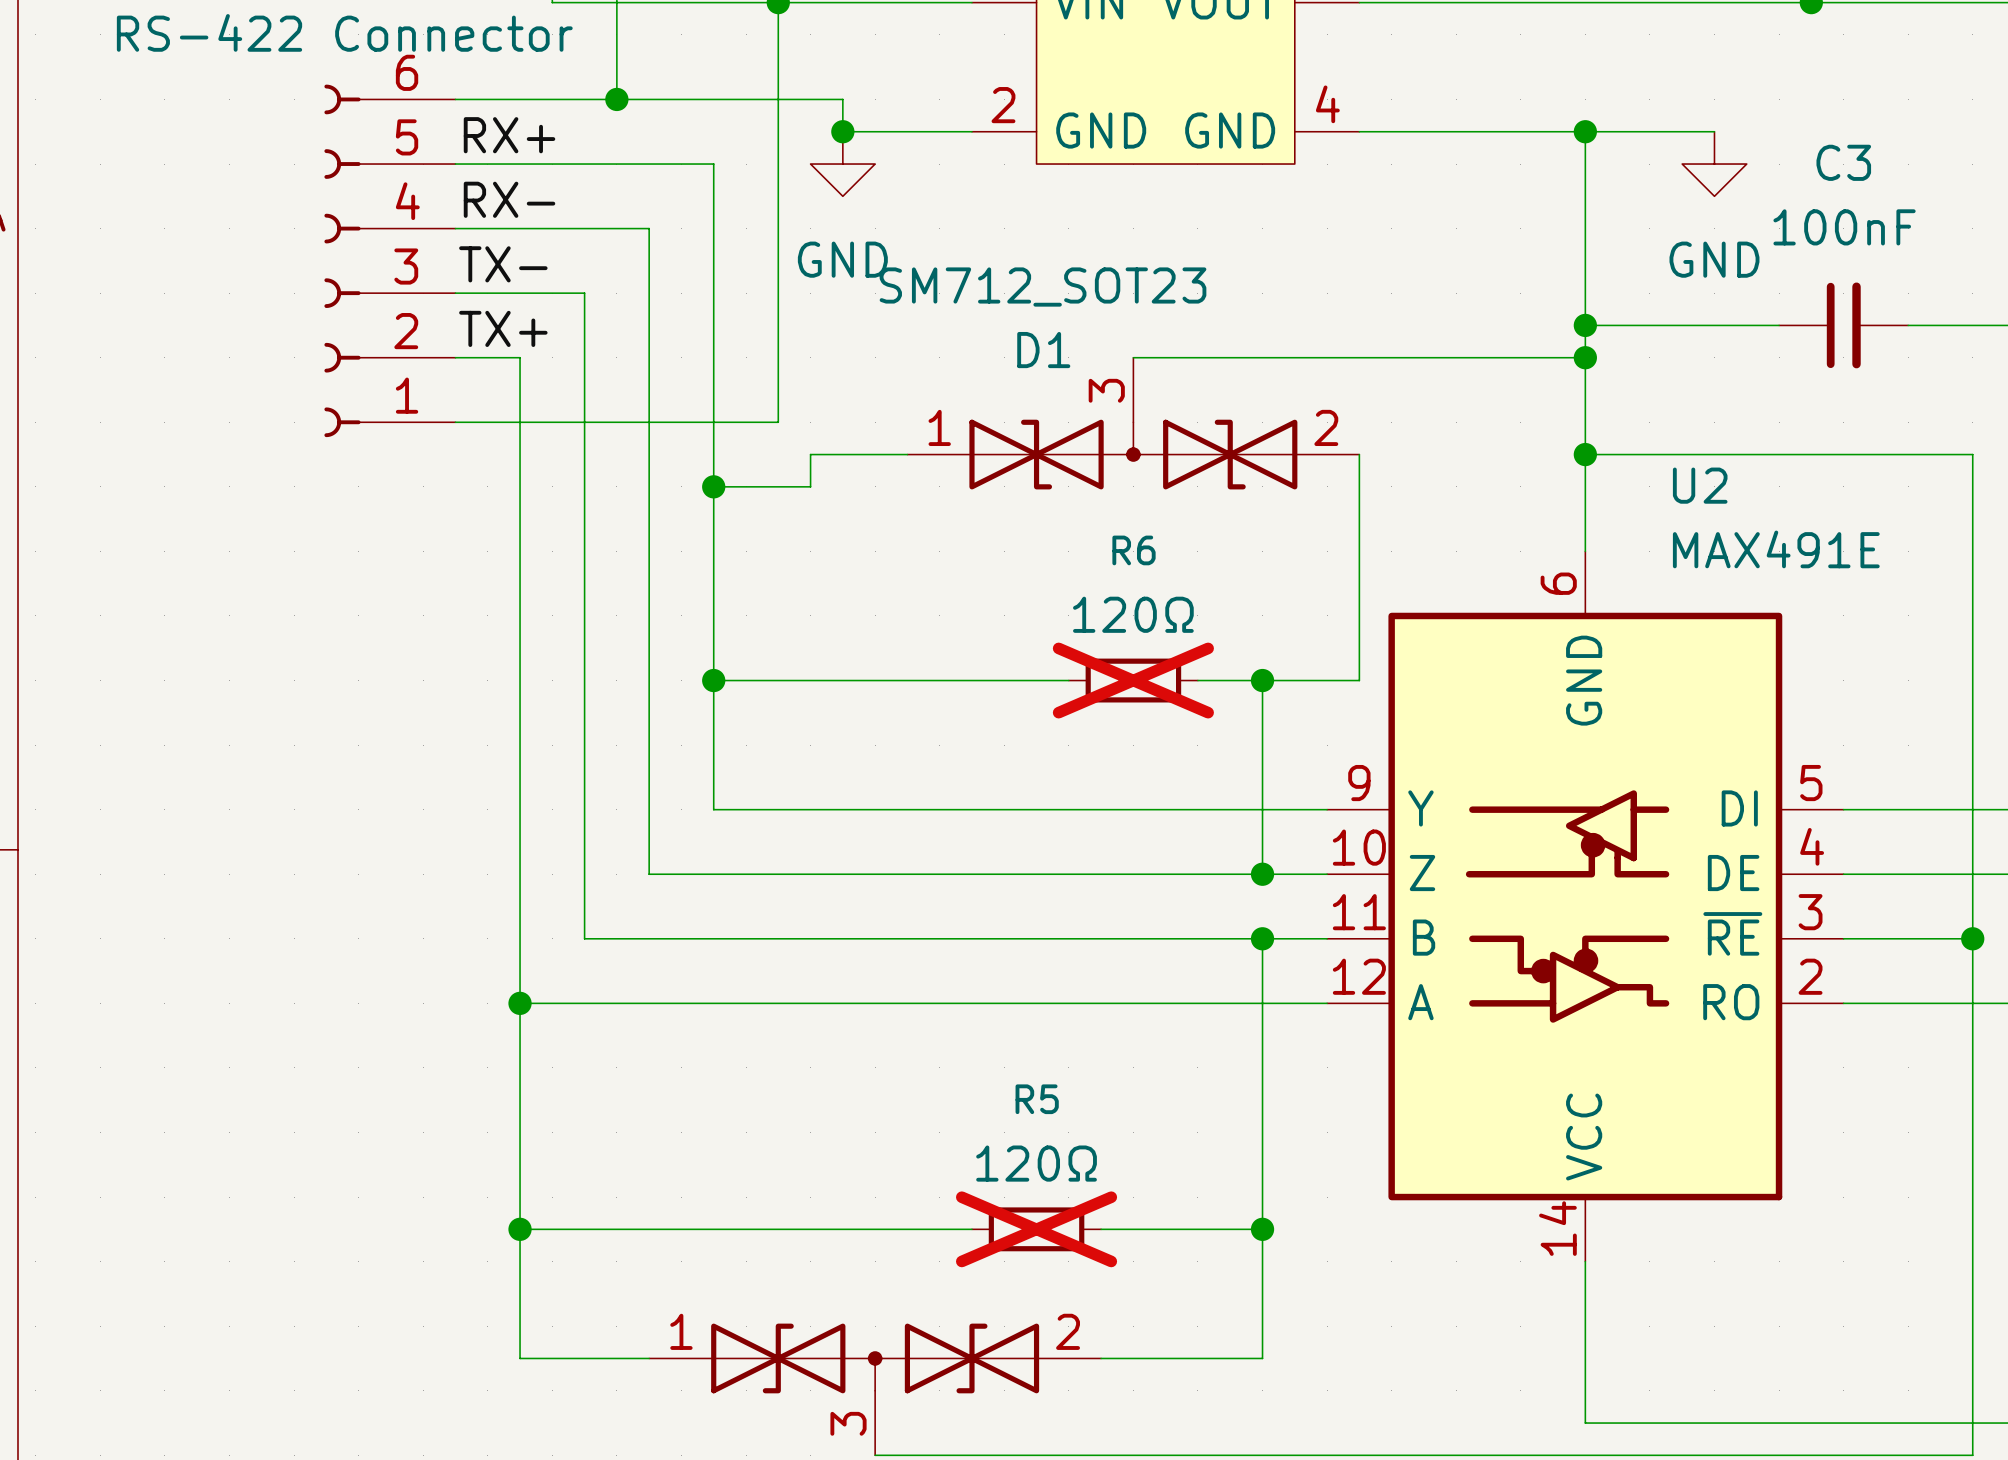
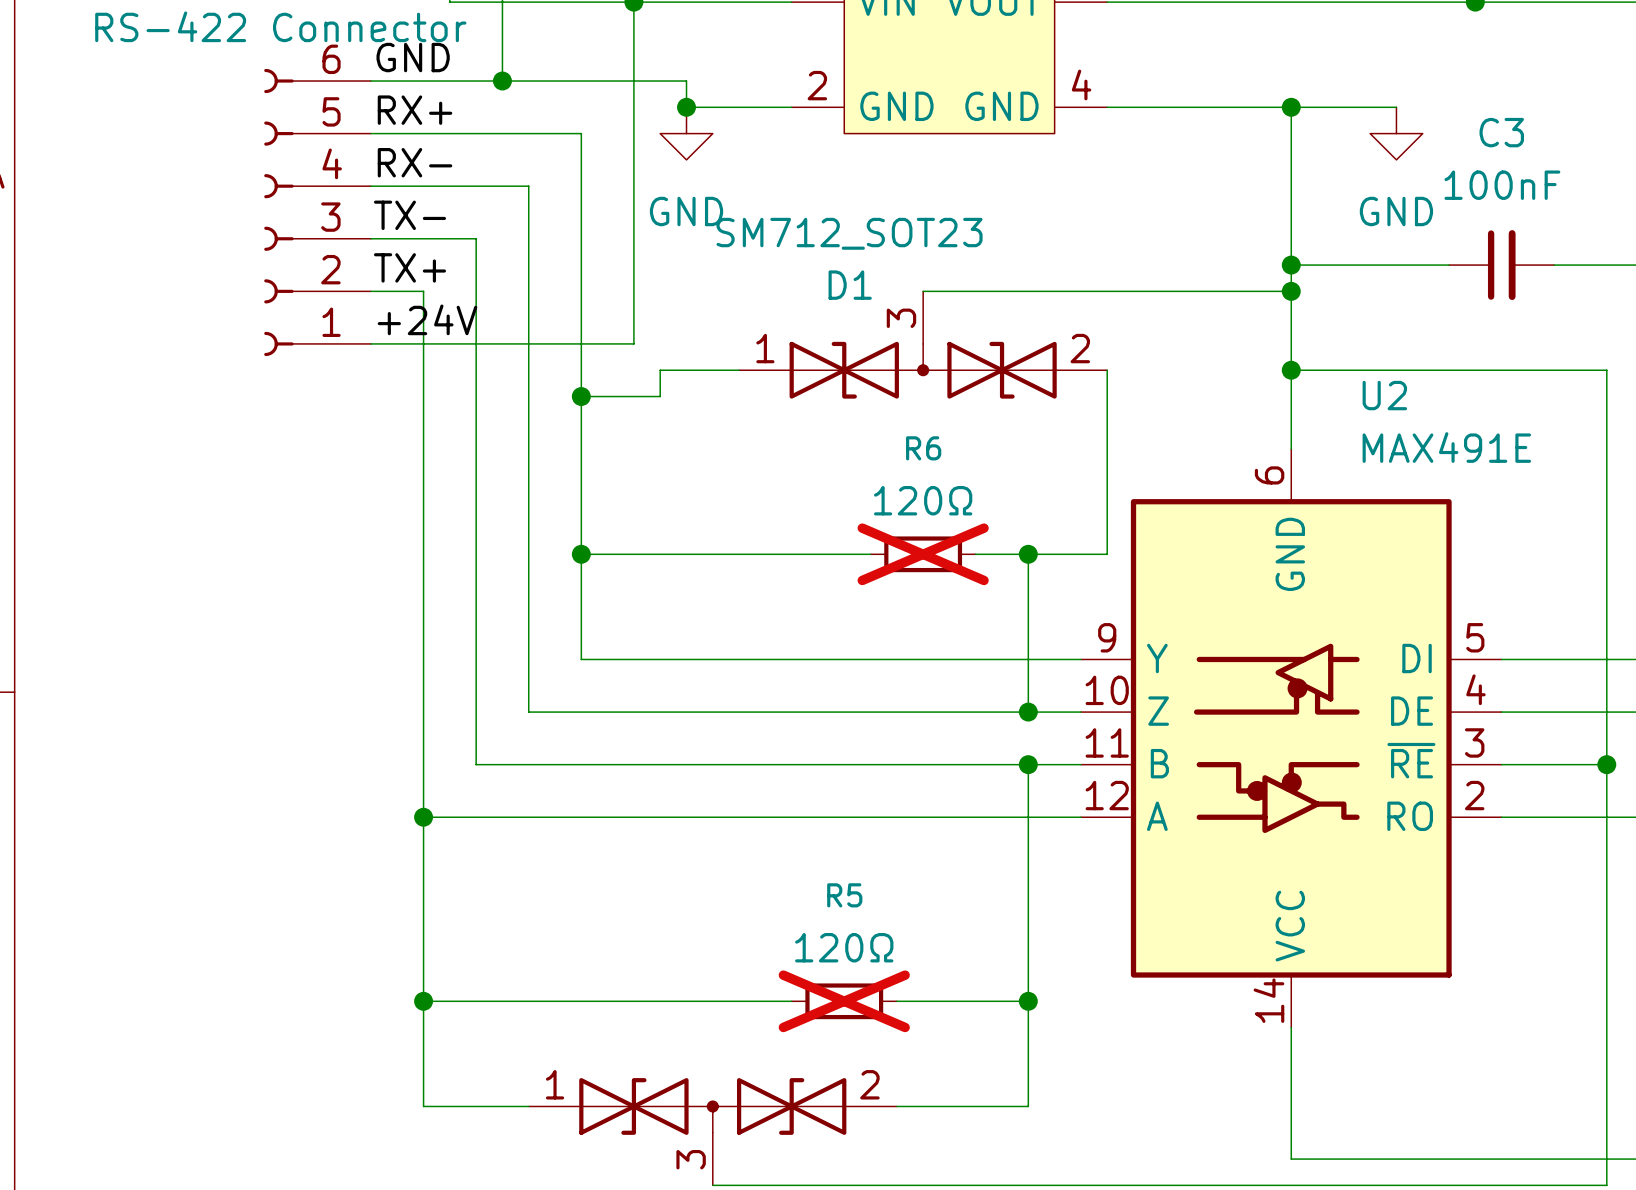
label: none -> GND (413, 57)
label: none -> +24V (427, 319)

